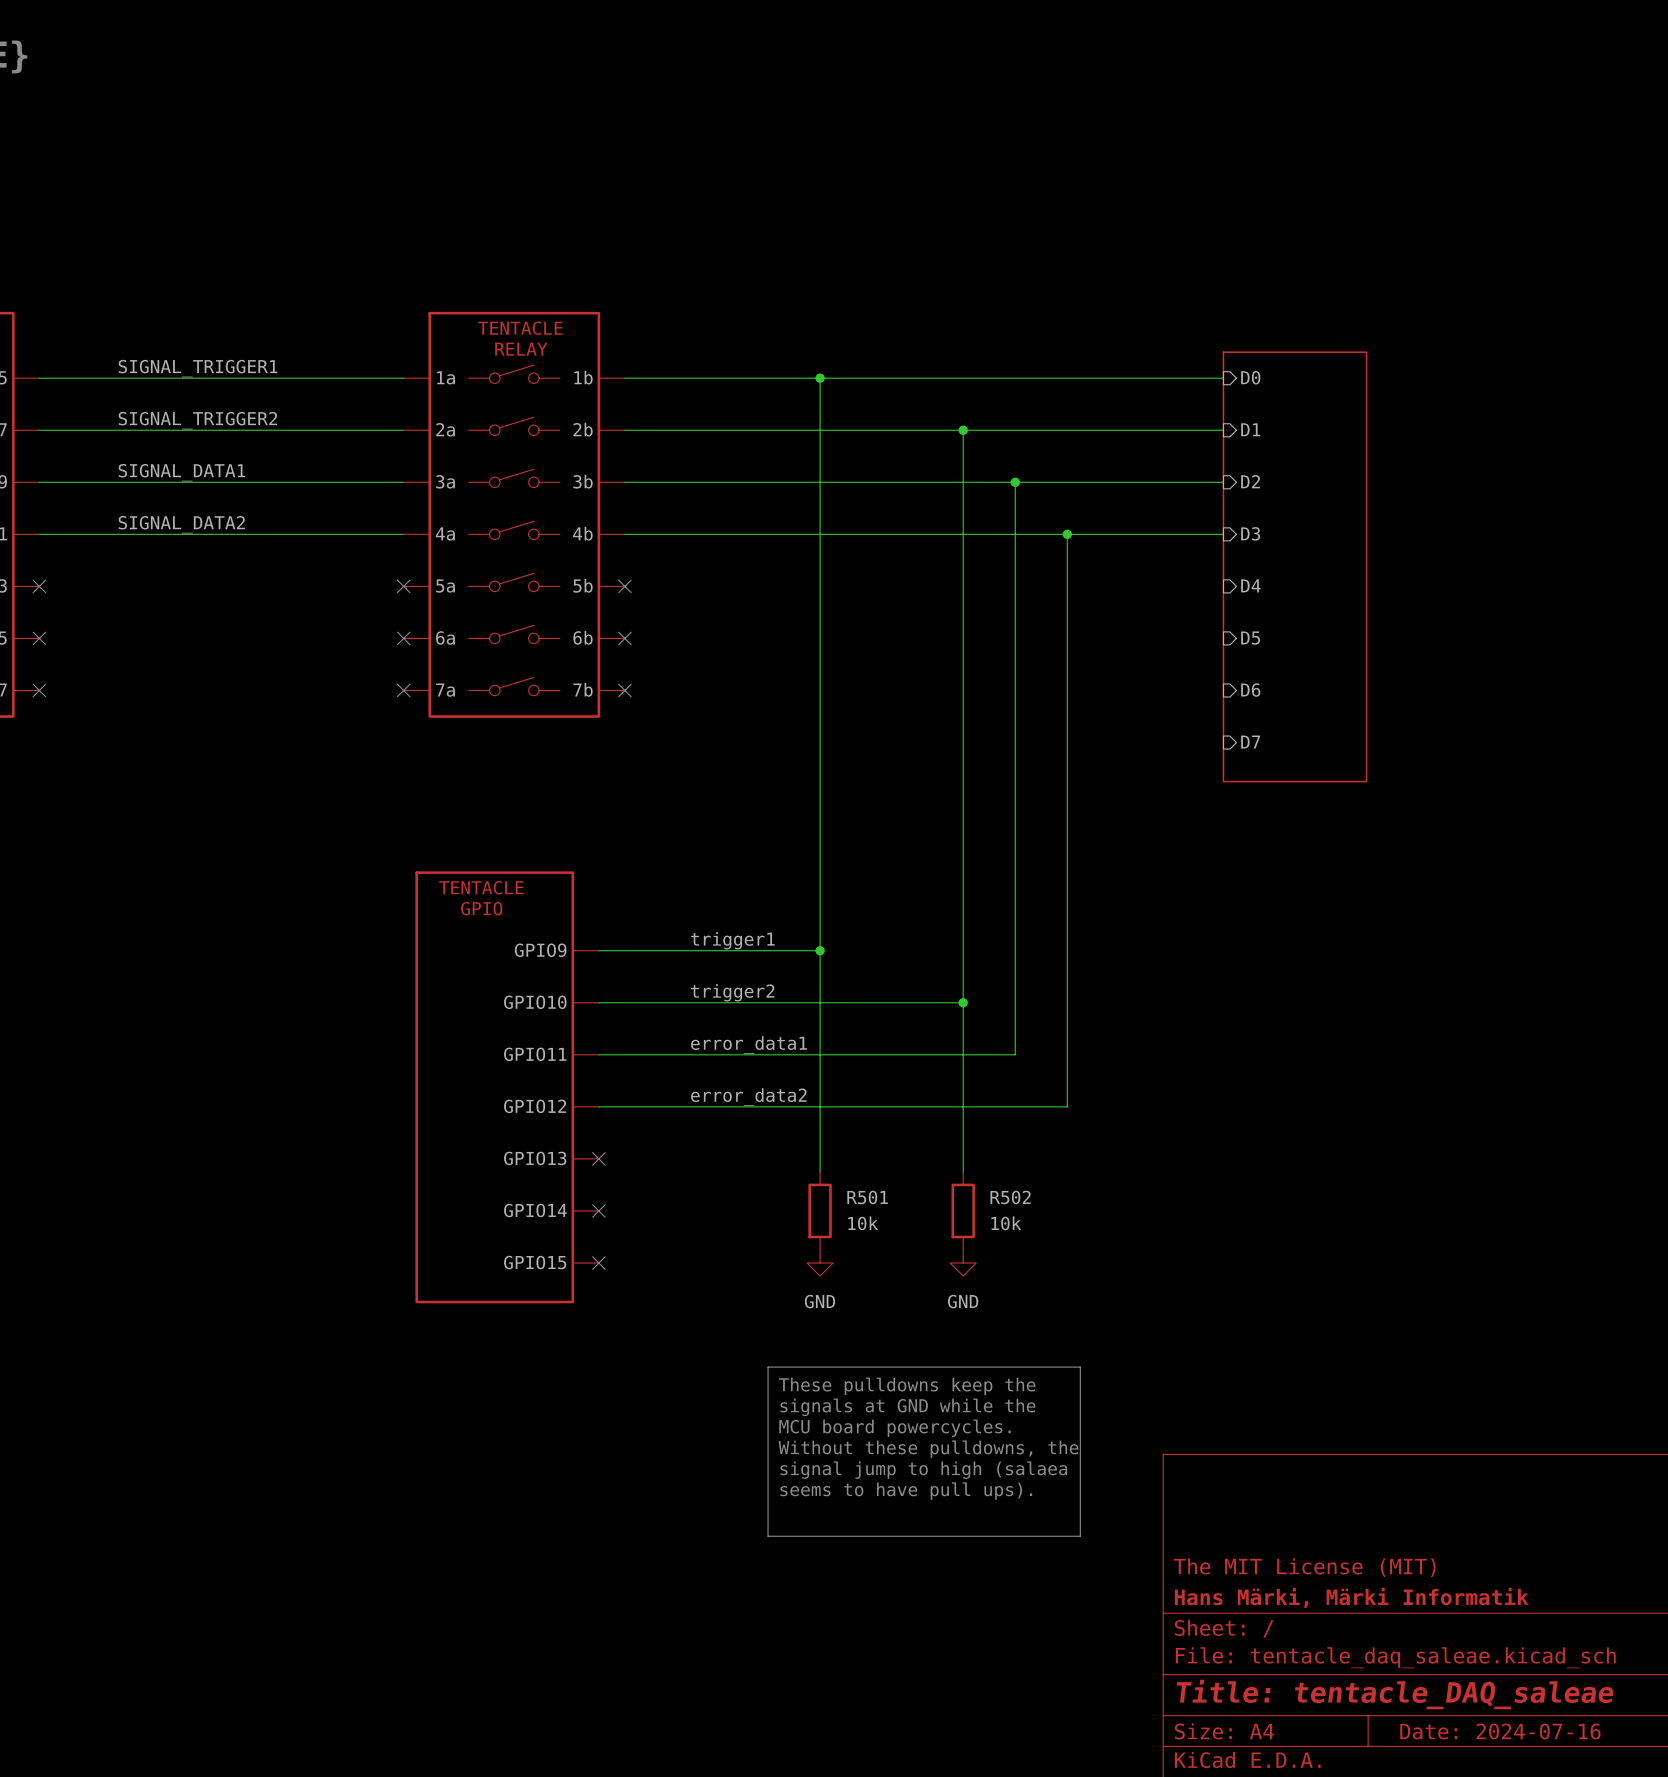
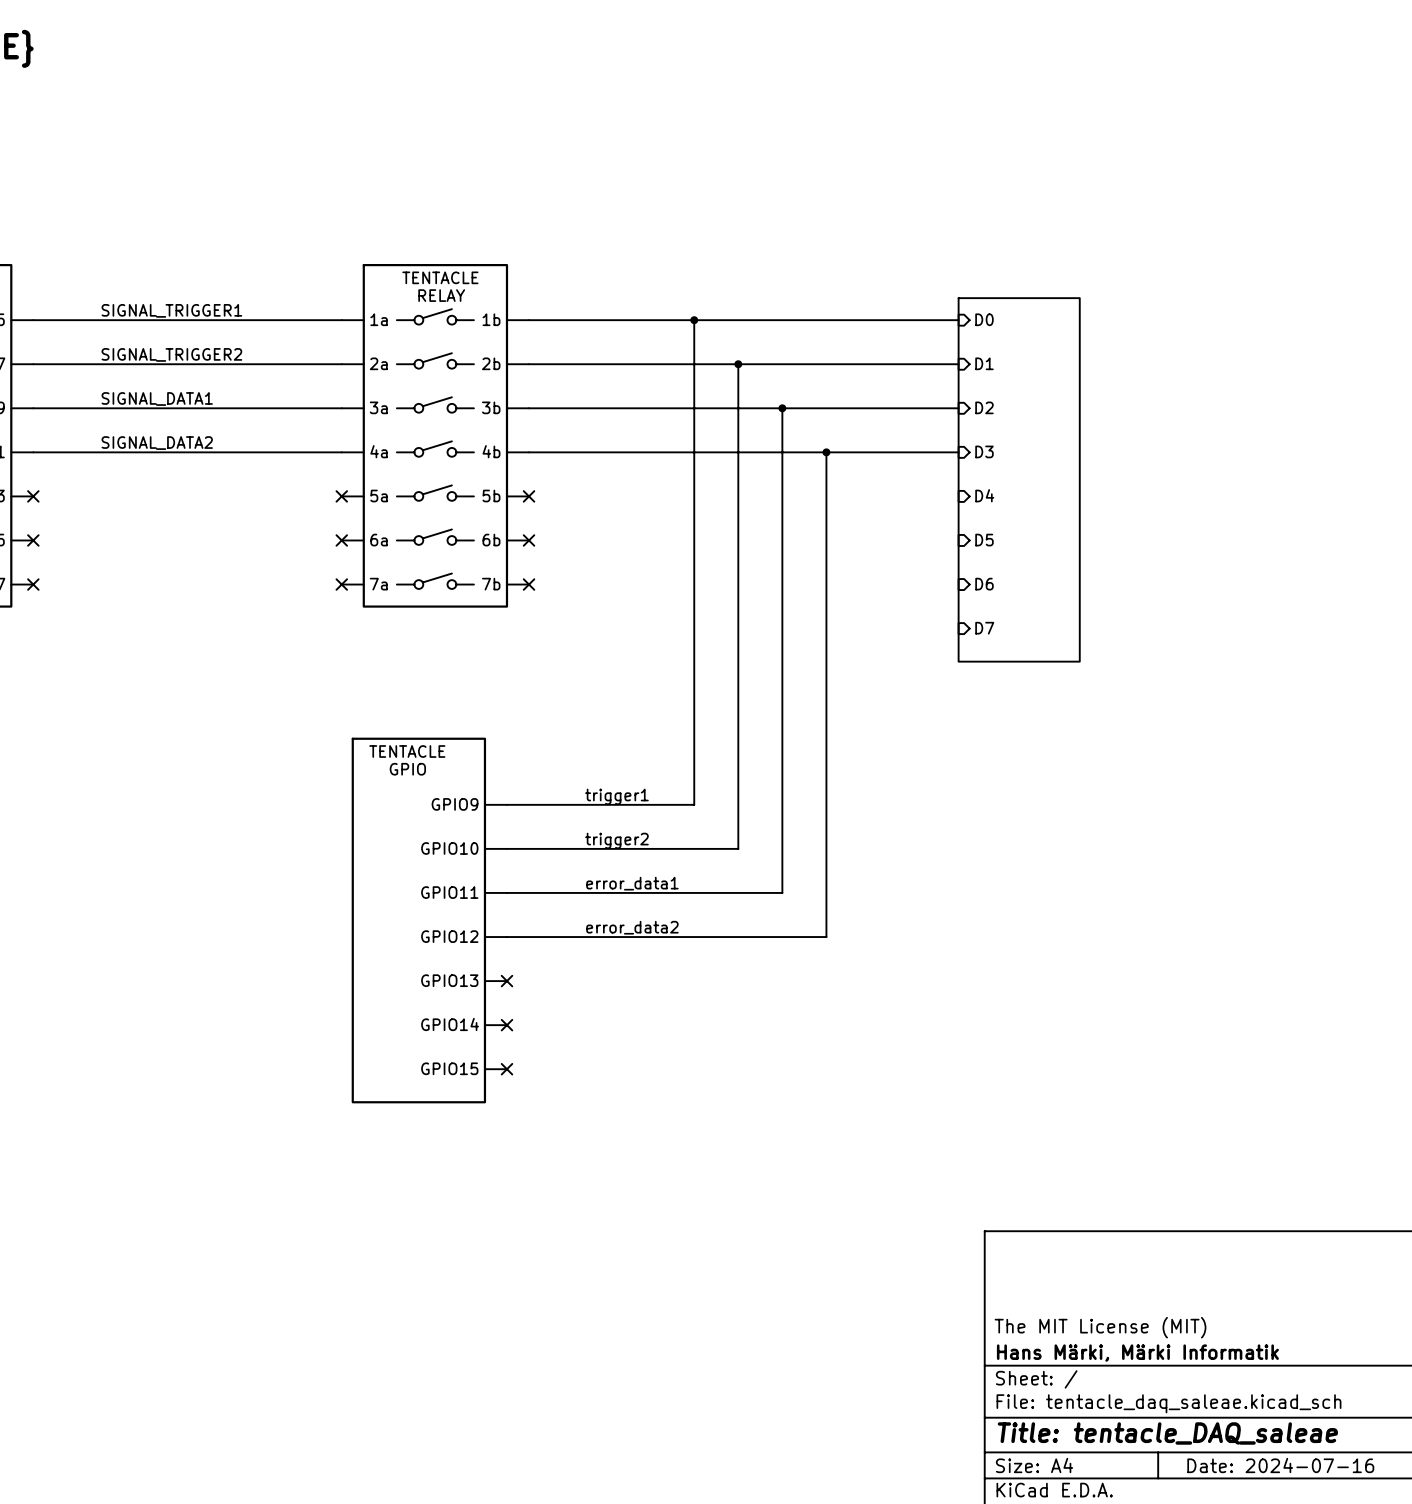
sheet pin position: D0 (1250, 377) -> D0 (984, 319)
wire: (1132, 378) (1223, 378) -> none
sheet pin position: D1 (1250, 429) -> D1 (984, 363)
junction: none -> (738, 364)
wire: (963, 430) (963, 1171) -> none
junction: (963, 430) -> none
wire: (1132, 430) (1223, 430) -> none
sheet pin position: D2 (1250, 481) -> D2 (984, 407)
junction: none -> (782, 408)
wire: (1015, 482) (1015, 1054) (924, 1054) -> (782, 408) (782, 892)
junction: (1015, 482) -> none
wire: (1132, 482) (1223, 482) -> none
sheet pin position: D3 (1250, 533) -> D3 (984, 451)
junction: none -> (826, 452)
wire: (1067, 534) (1067, 1106) (976, 1106) -> (826, 452) (826, 937)
junction: (1067, 534) -> none
wire: (1132, 534) (1223, 534) -> none
sheet position: (1295, 566) -> (1019, 479)
sheet pin position: D4 (1250, 585) -> D4 (984, 495)
sheet pin position: D5 (1250, 638) -> D5 (984, 540)
sheet pin position: D6 (1250, 690) -> D6 (984, 584)
sheet pin position: D7 (1250, 742) -> D7 (984, 628)
wire: (820, 950) (820, 1171) -> none
junction: (820, 950) -> none
wire: (872, 1002) (963, 1002) -> (738, 848) (738, 364)
junction: (963, 1002) -> none
R501: 10k (820, 1210) -> none
R502: 10k (963, 1210) -> none
power symbol: GND (820, 1263) -> none
power symbol: GND (963, 1263) -> none
line: (768, 1367) (1080, 1367) (1080, 1536) (768, 1536) (768, 1367) -> none
text: These pulldowns keep the (907, 1386) -> none
text: signals at GND while the (907, 1407) -> none
text: MCU board powercycles. (895, 1428) -> none
text: Without these pulldowns, the (928, 1449) -> none
text: signal jump to high (salaea (923, 1470) -> none
text: seems to have pull ups). (906, 1491) -> none

